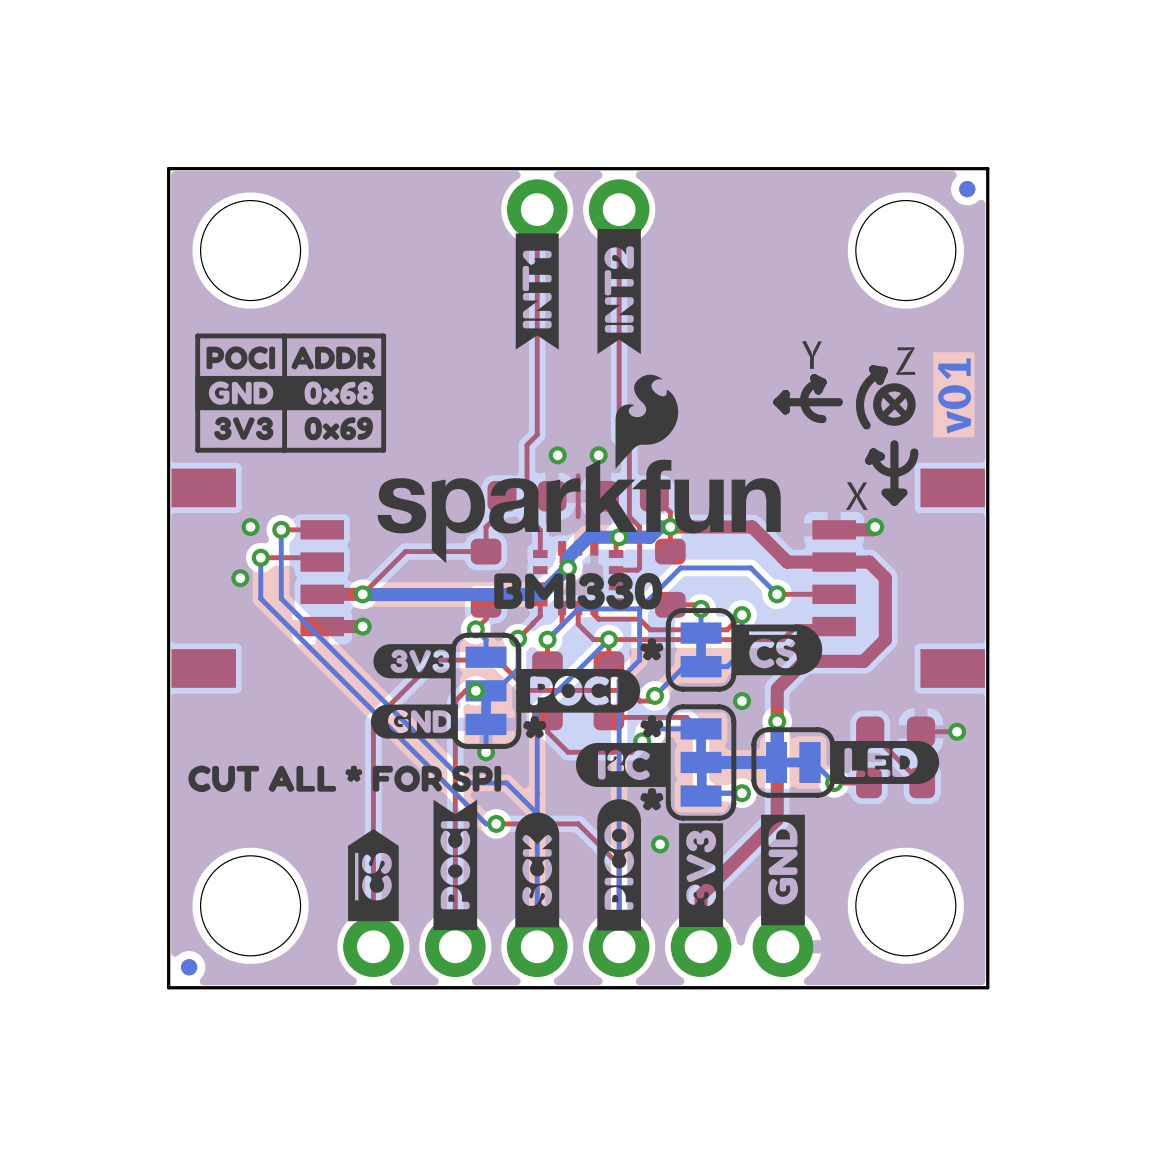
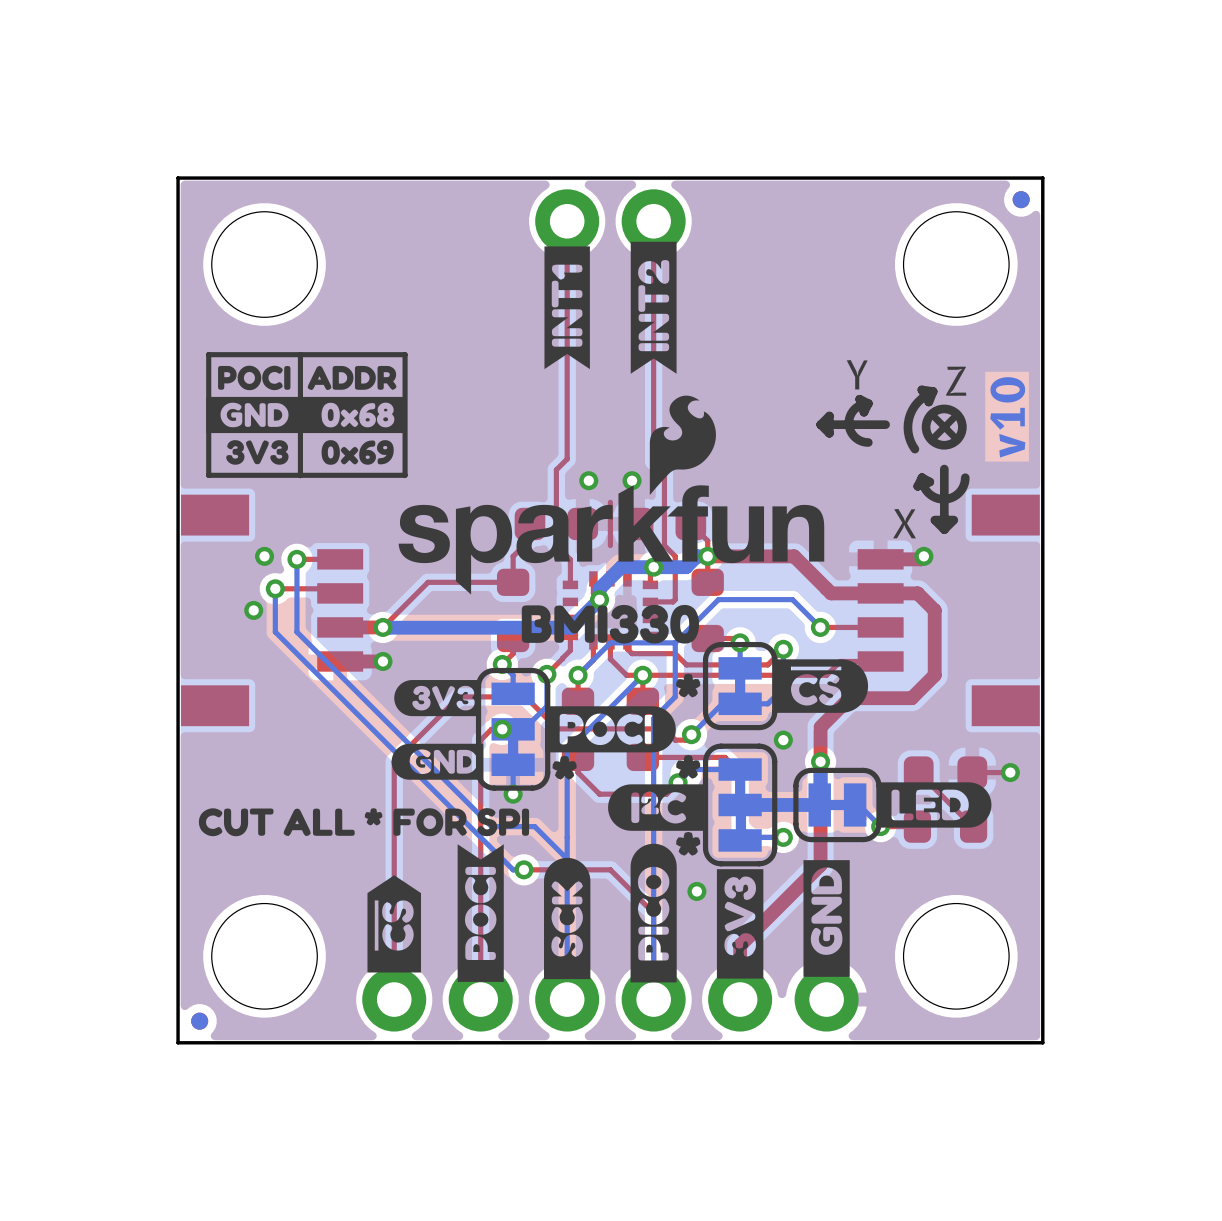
text: v01 (954, 395) -> v10 (1007, 417)

